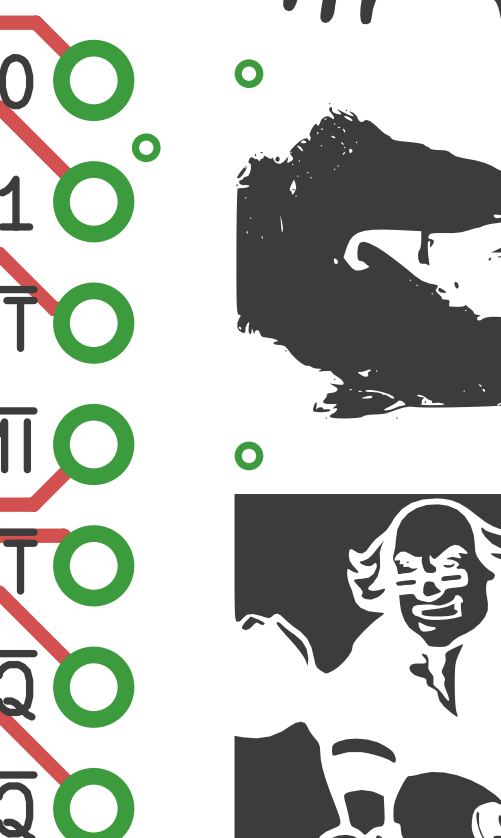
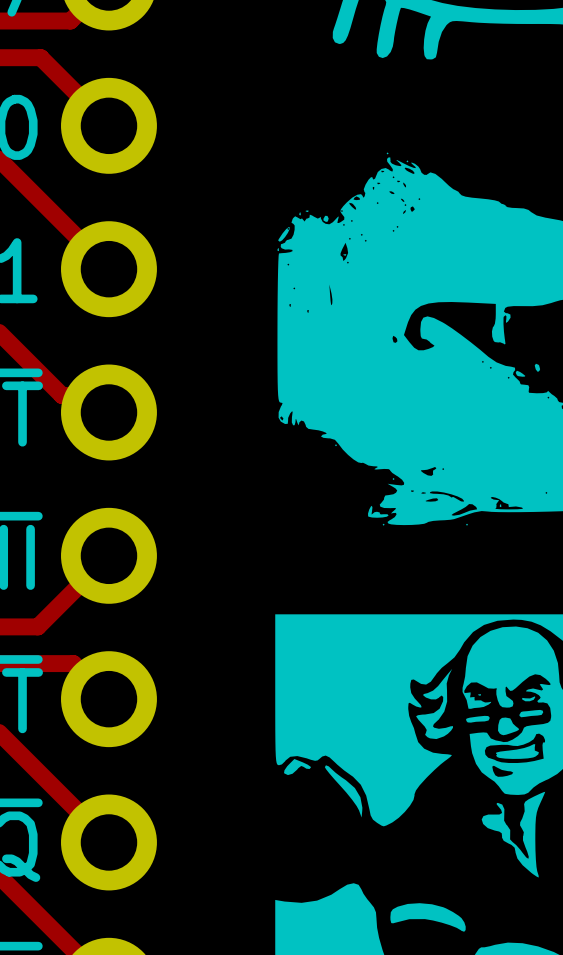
via: (248, 73) -> none
via: (146, 147) -> none
via: (248, 455) -> none

